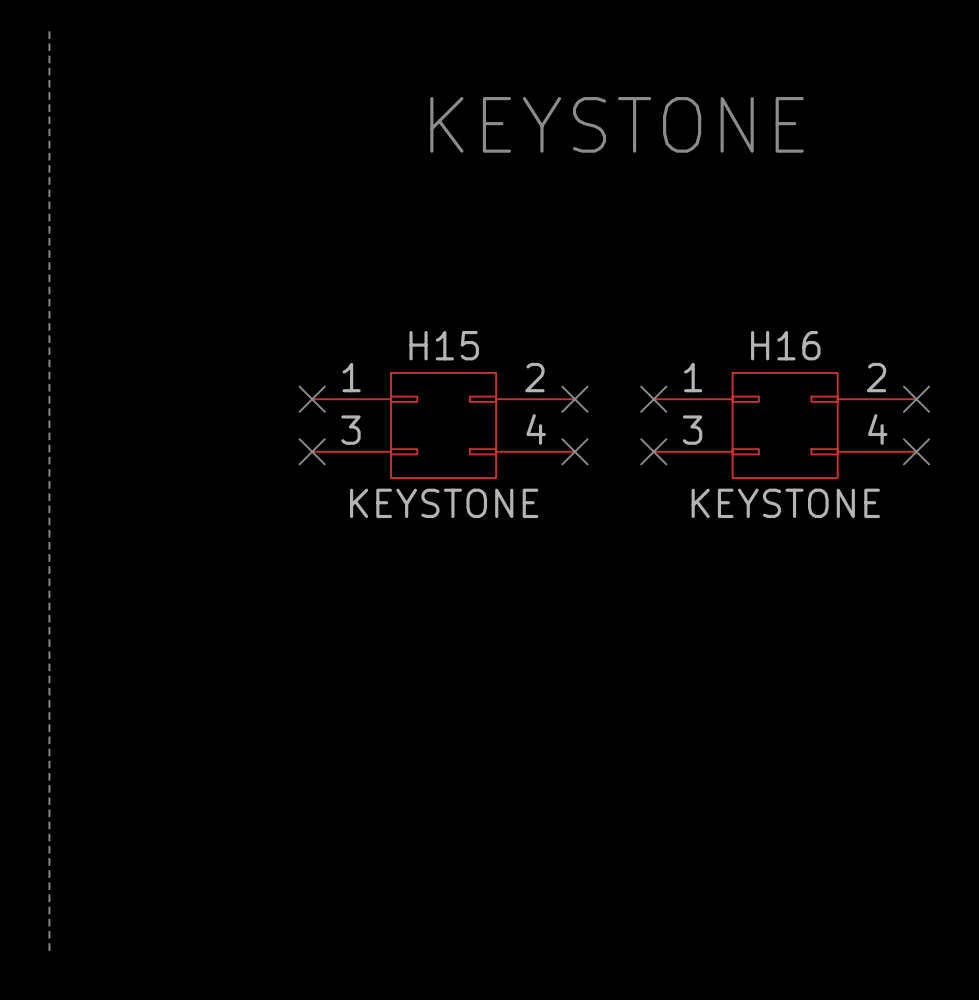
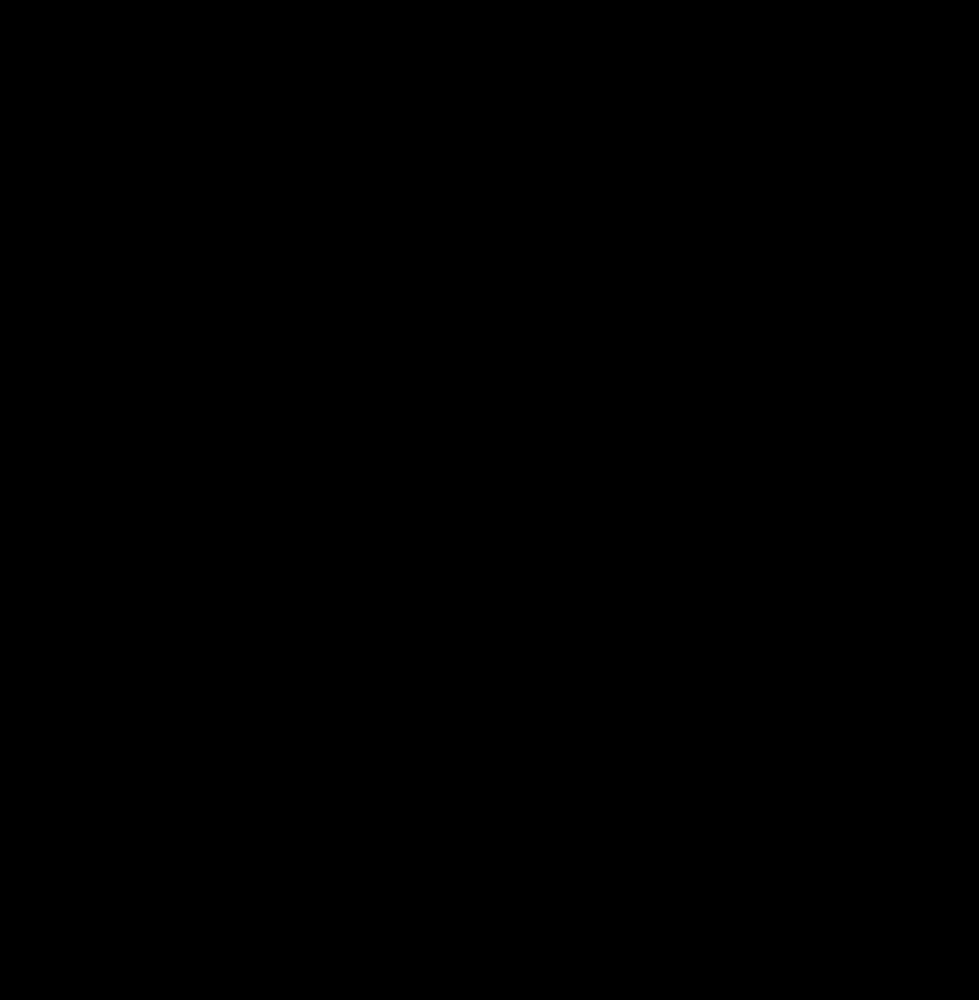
line: (49, 31) (49, 951) -> none
text: KEYSTONE (617, 124) -> none
no-connect mark: (312, 399) -> none
no-connect mark: (574, 399) -> none
no-connect mark: (653, 399) -> none
no-connect mark: (916, 399) -> none
H15: KEYSTONE (443, 425) -> none
H16: KEYSTONE (785, 425) -> none
no-connect mark: (312, 451) -> none
no-connect mark: (574, 451) -> none
no-connect mark: (653, 451) -> none
no-connect mark: (916, 451) -> none

